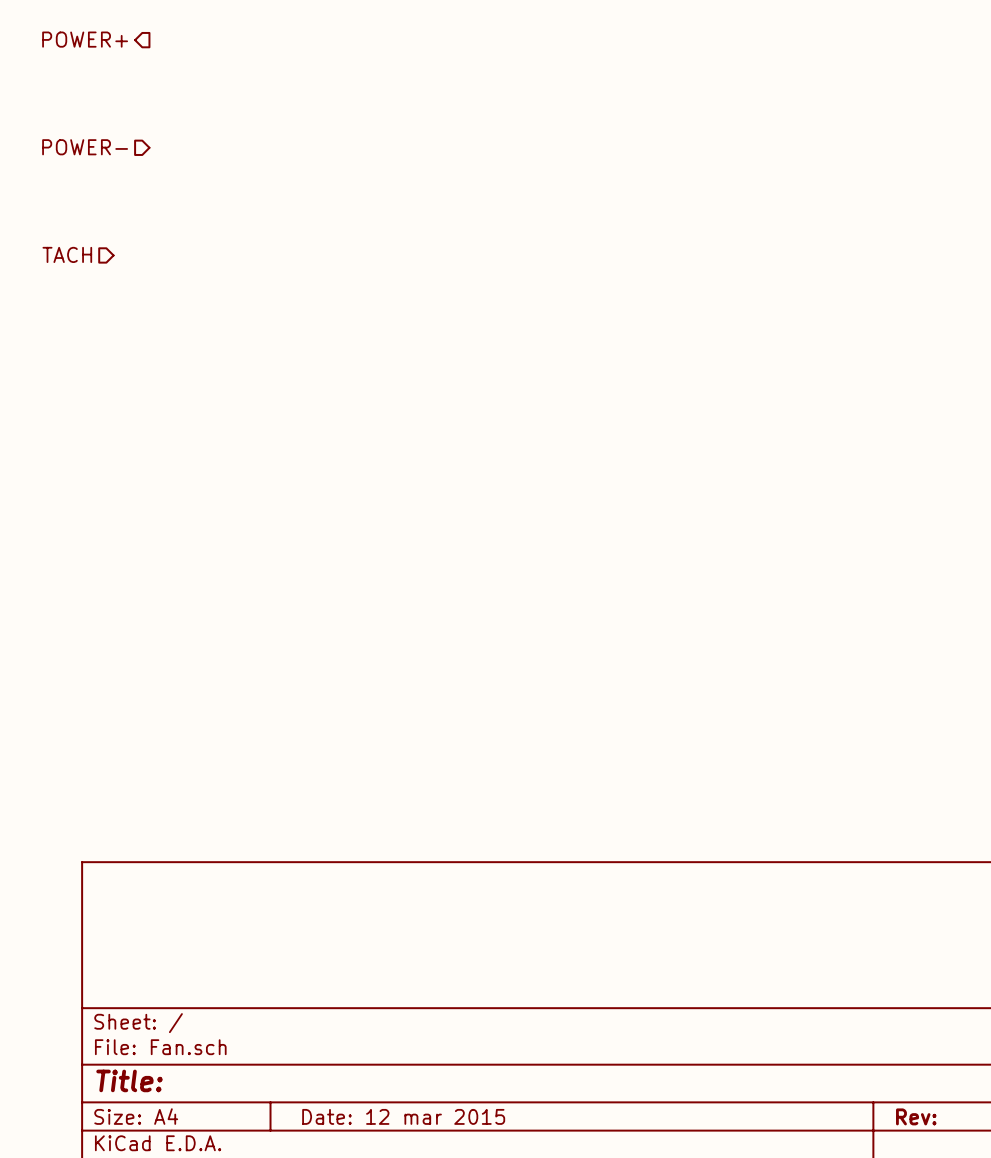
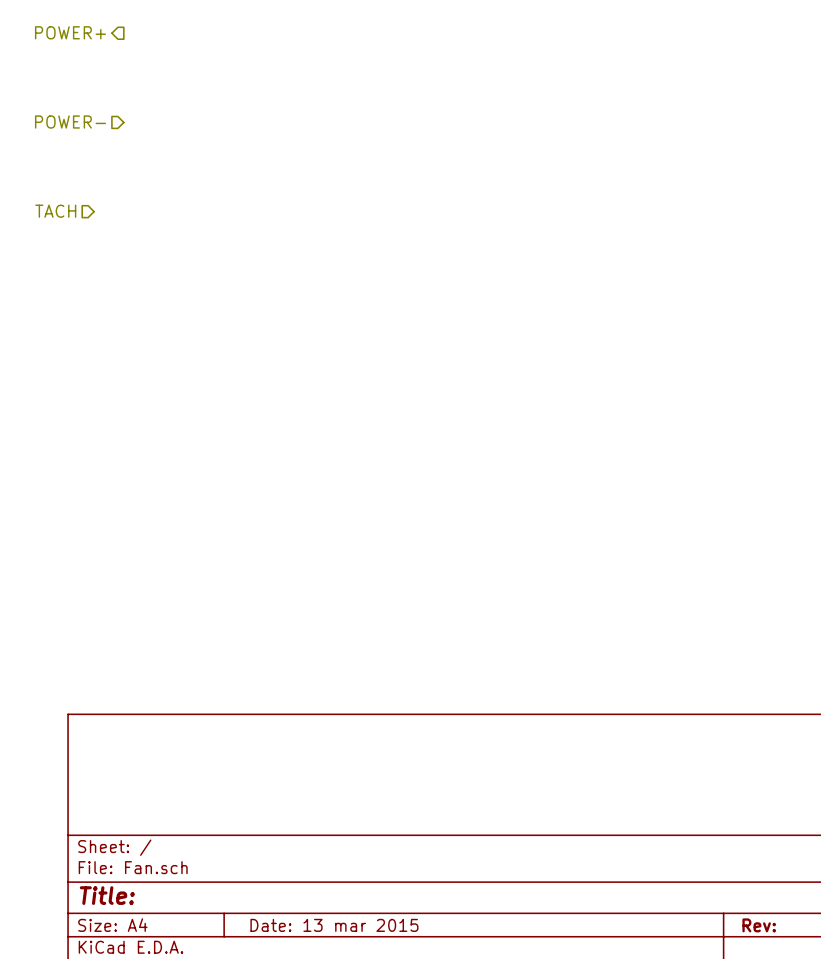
title block: Date: 12 mar 2015 (403, 1116) -> Date: 13 mar 2015 (334, 925)

